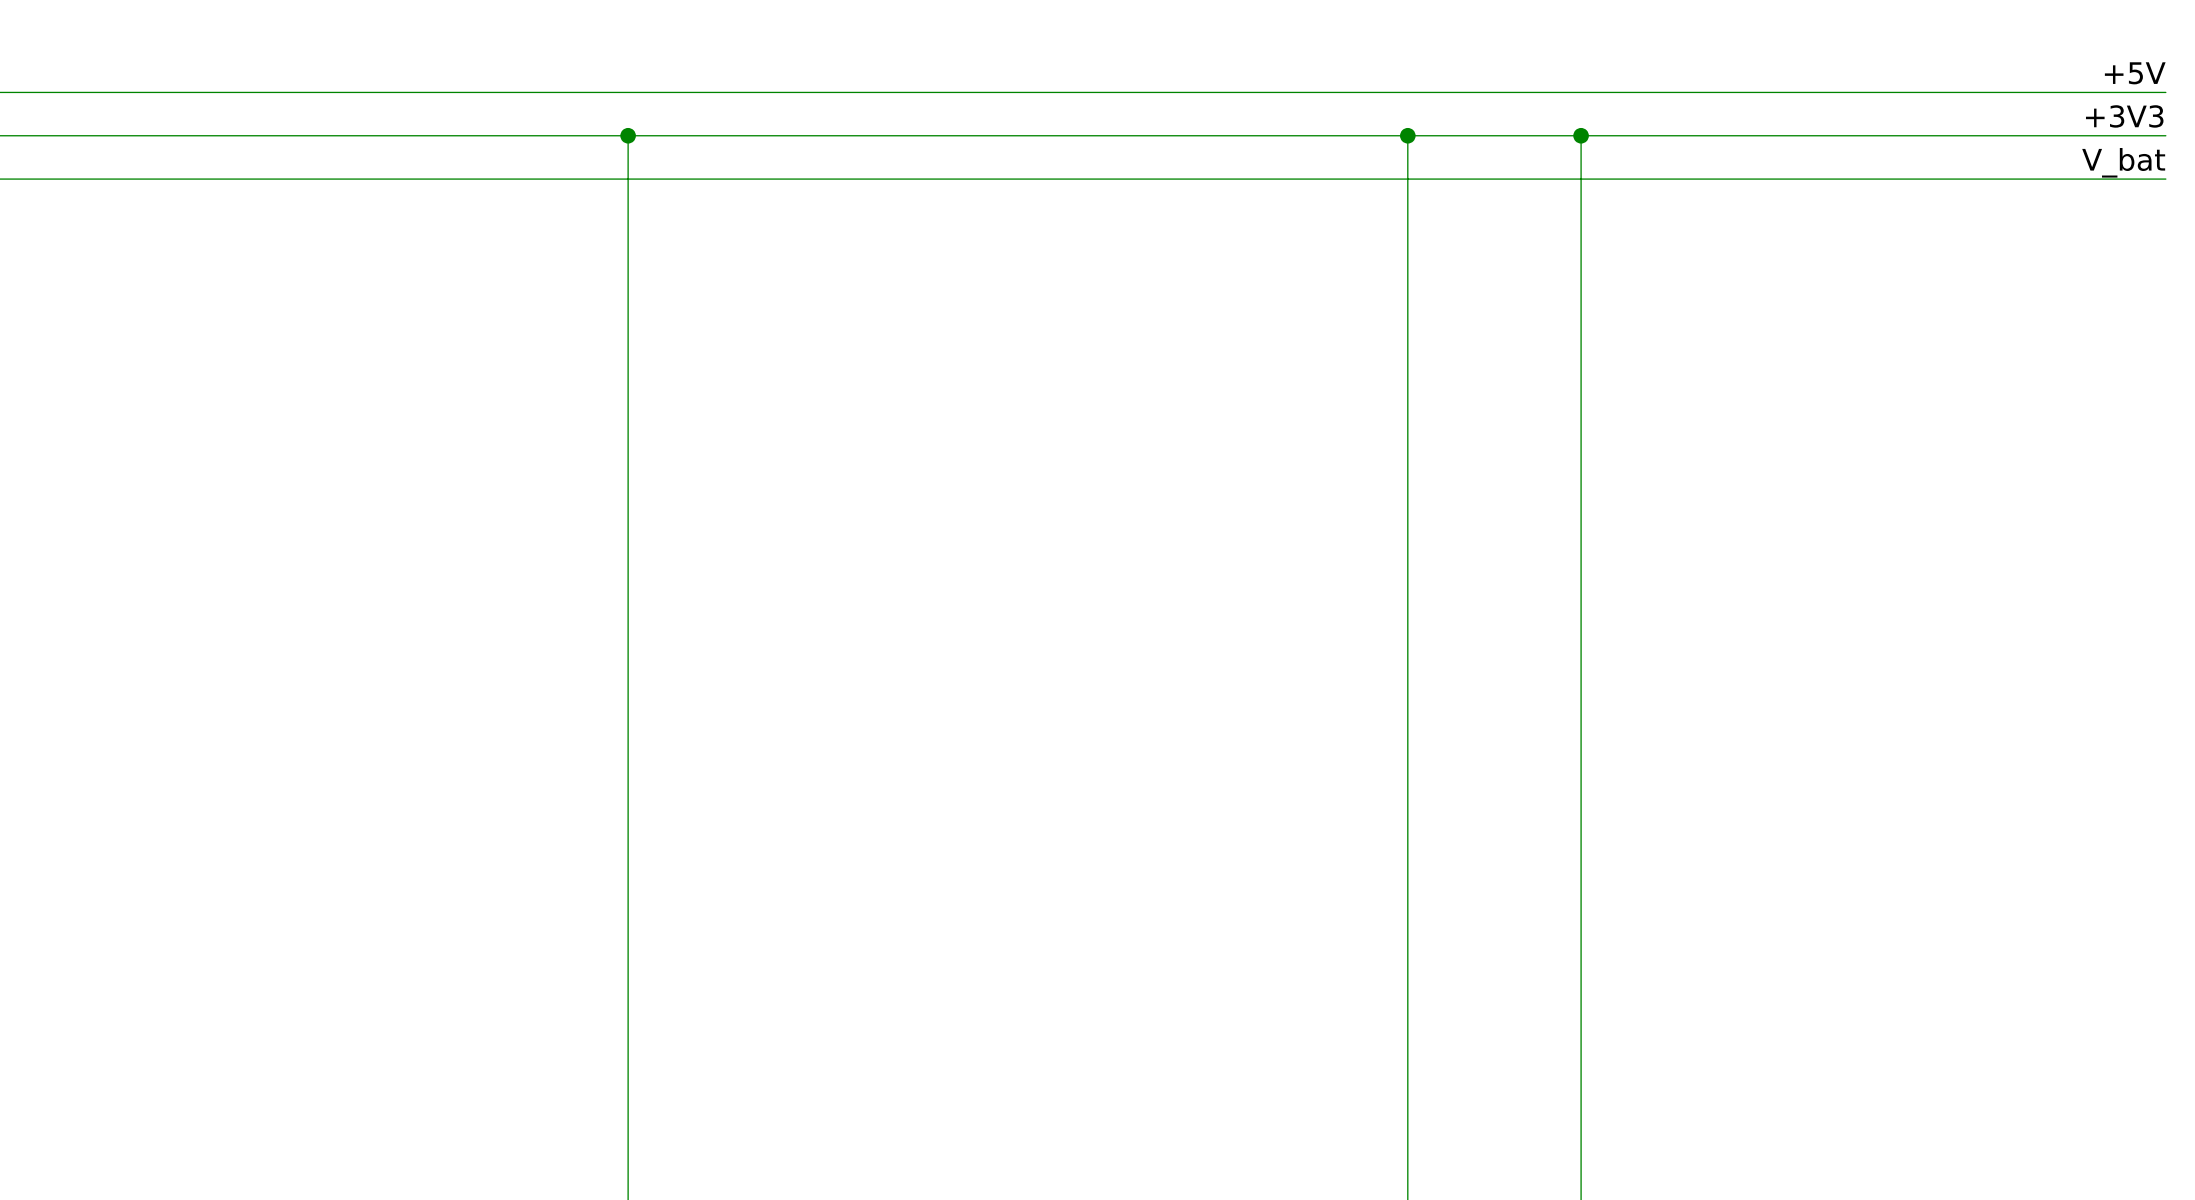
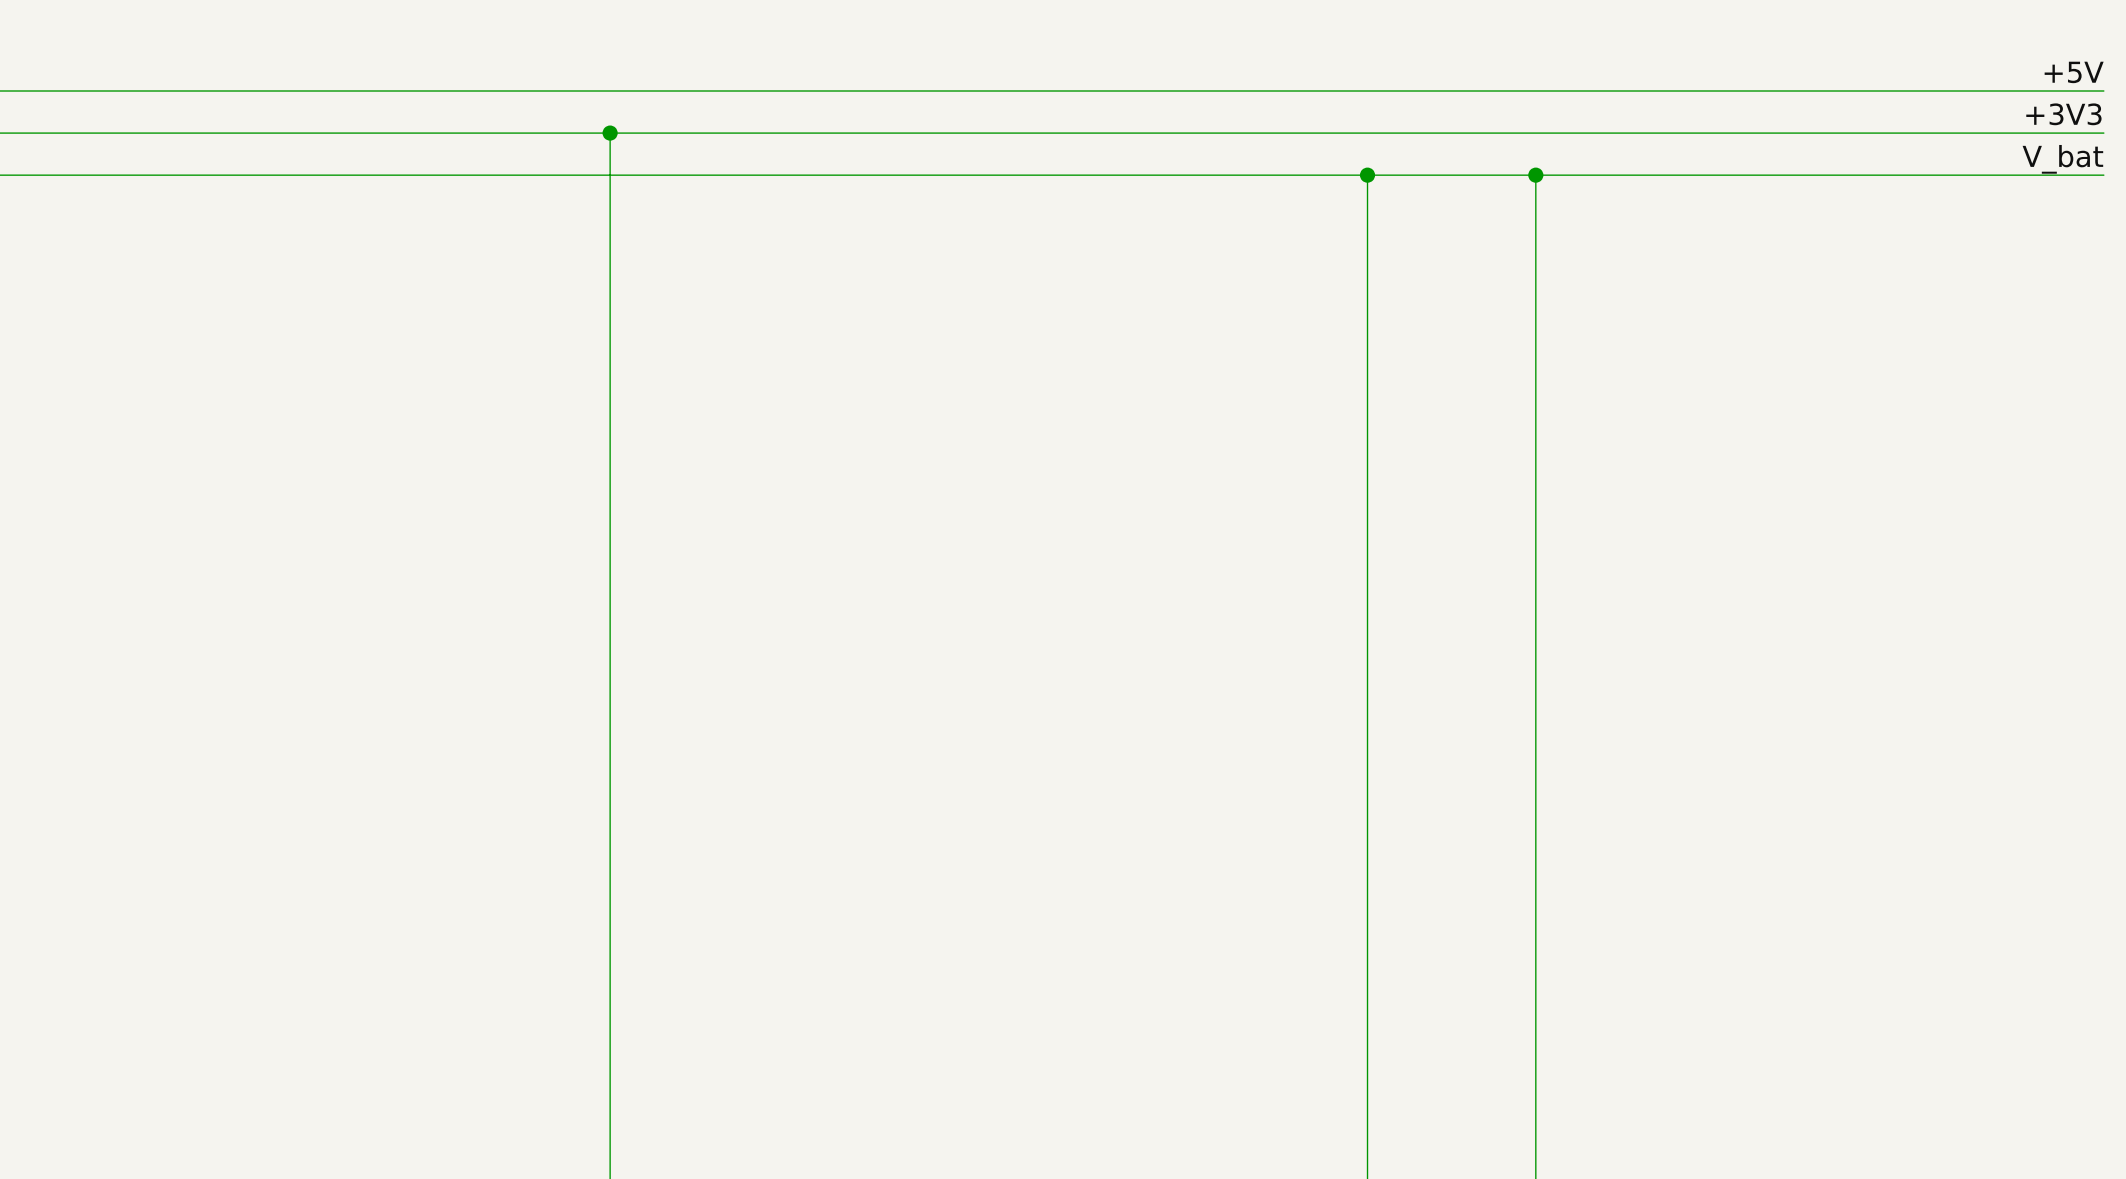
wire: (1407, 135) (1407, 179) -> none
junction position: (1407, 135) -> (1367, 175)
wire: (1581, 135) (1581, 179) -> none
junction position: (1581, 135) -> (1535, 175)

